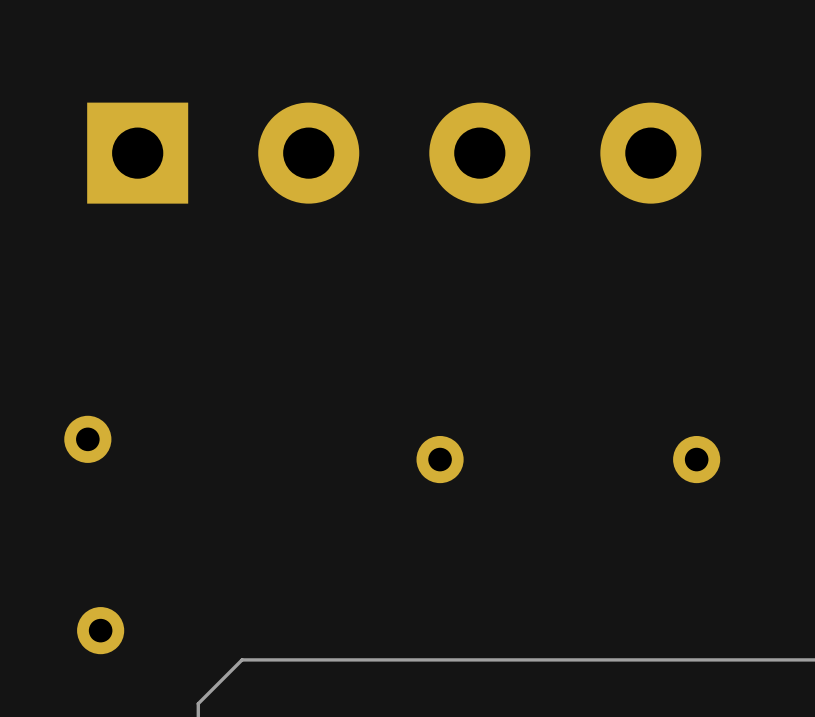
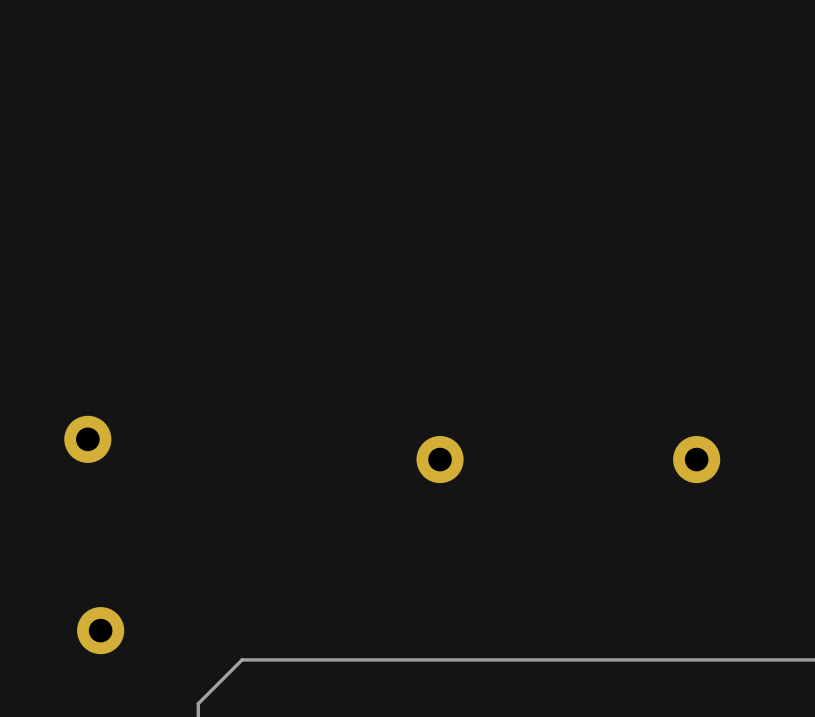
part: (394, 153) -> none

